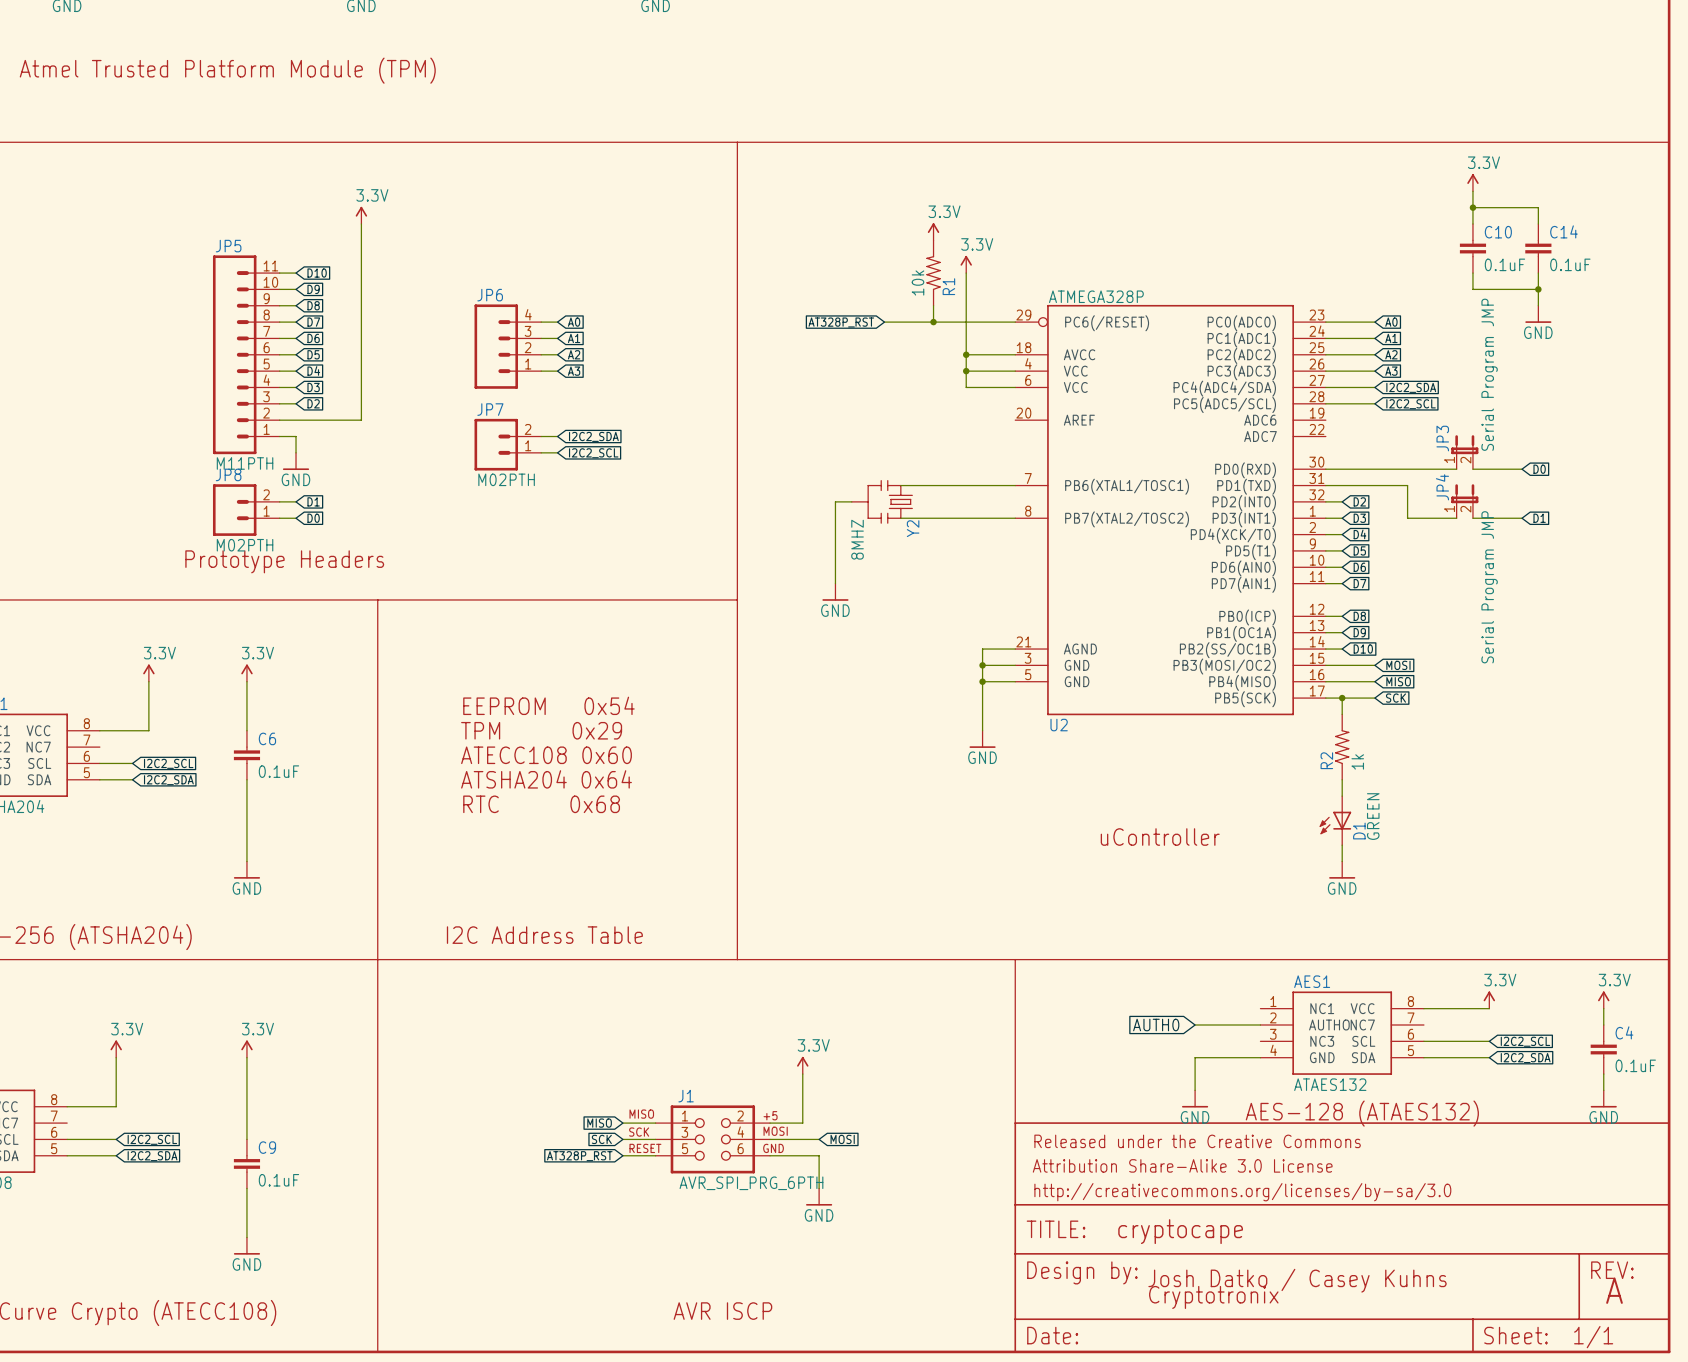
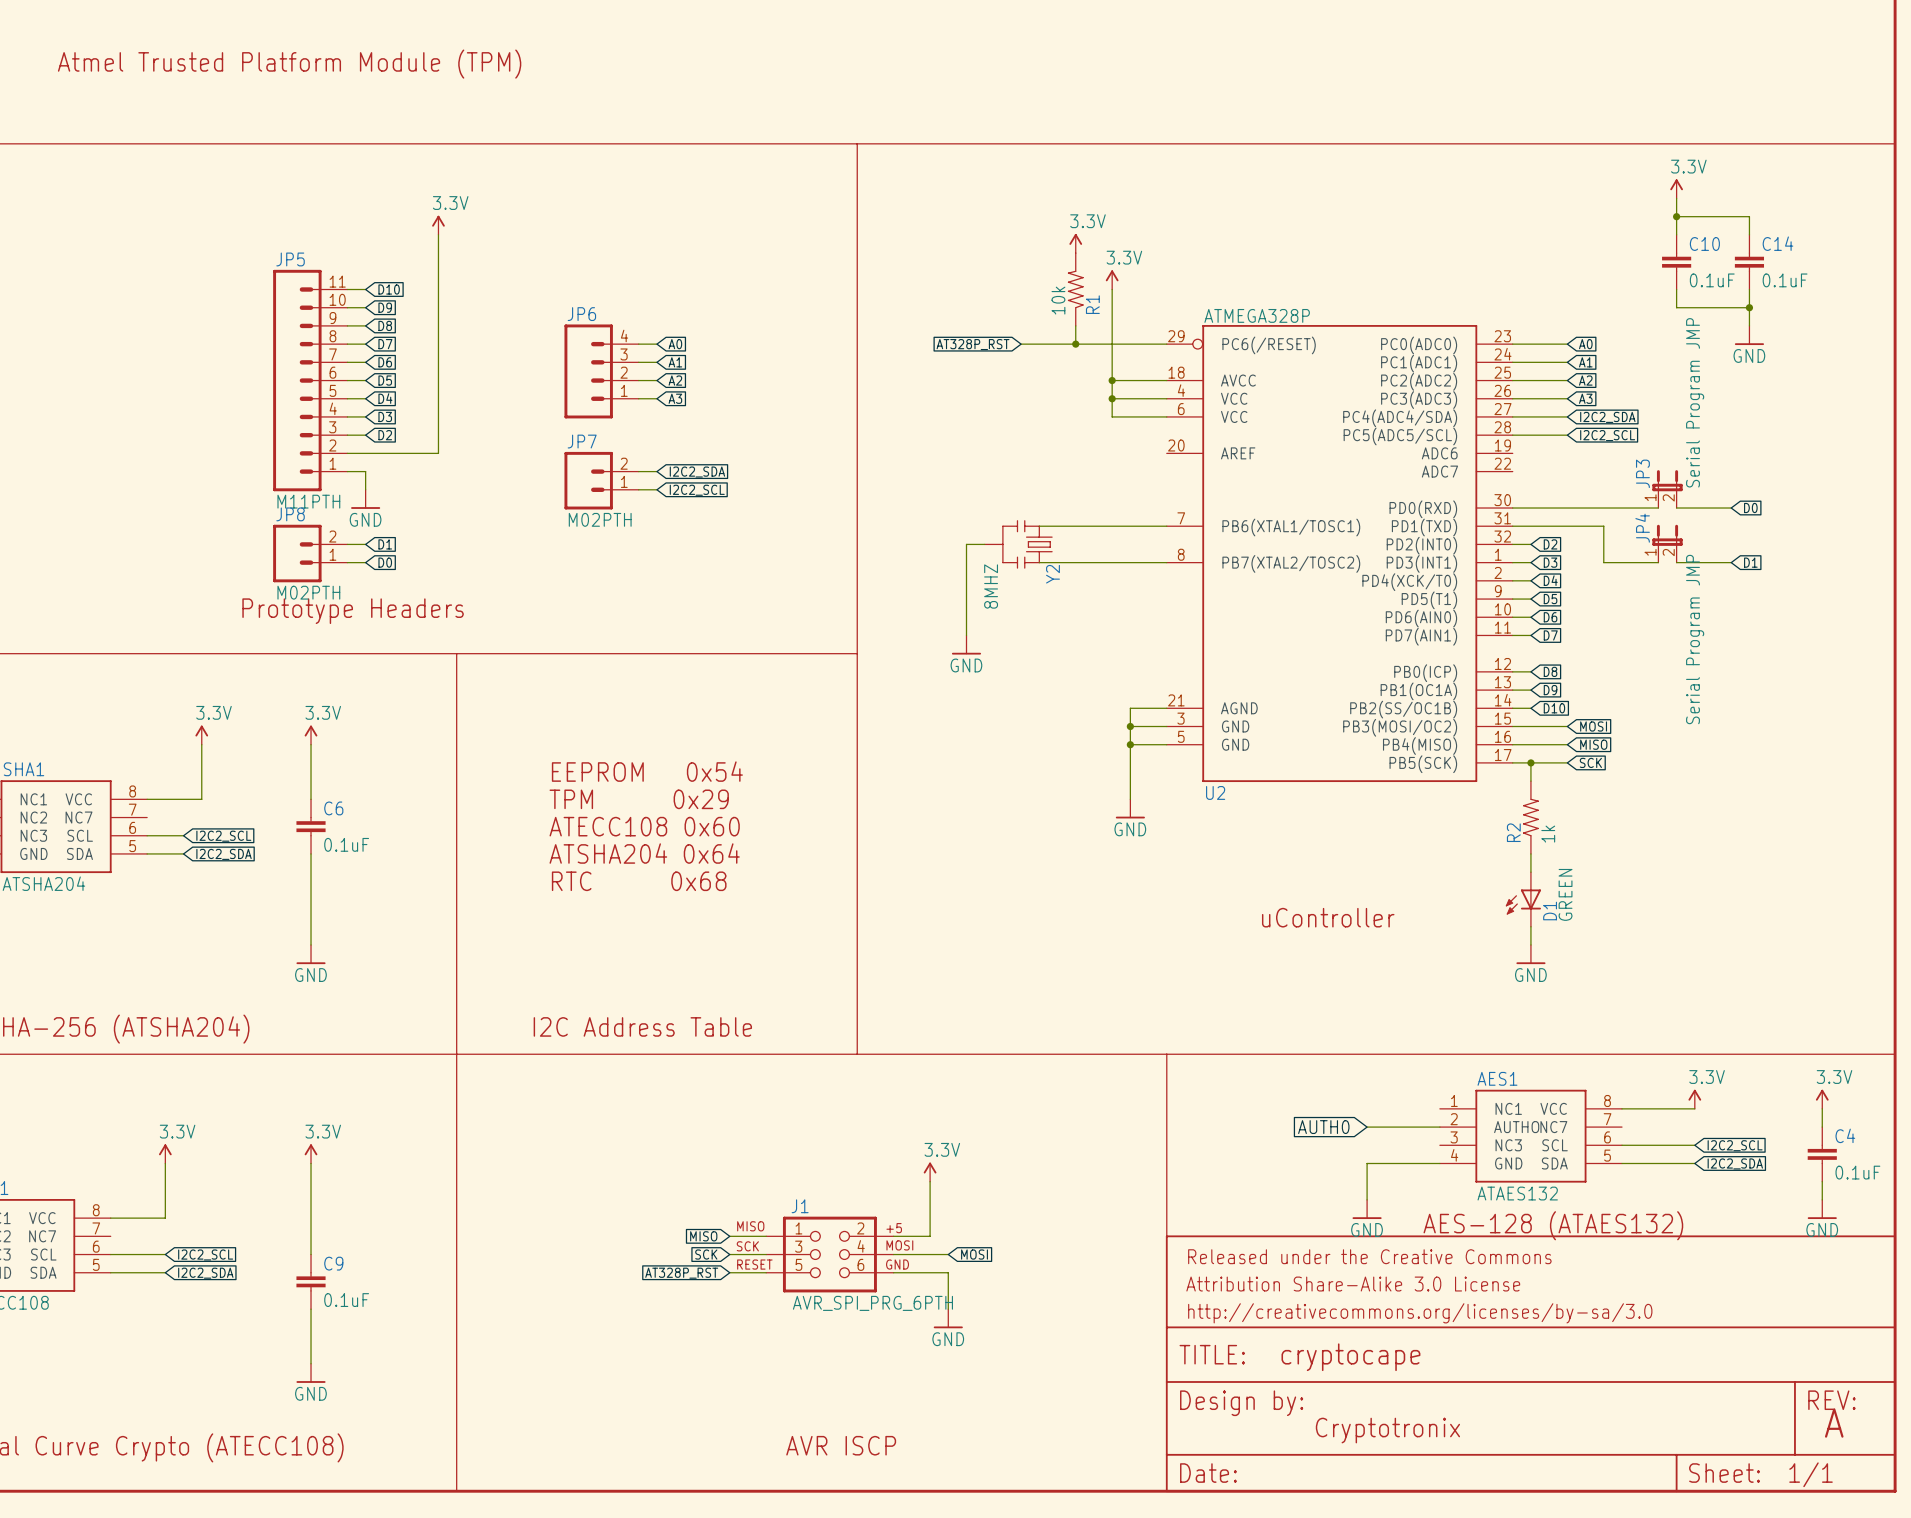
text: Josh Datko / Casey Kuhns (1297, 1280) -> none

